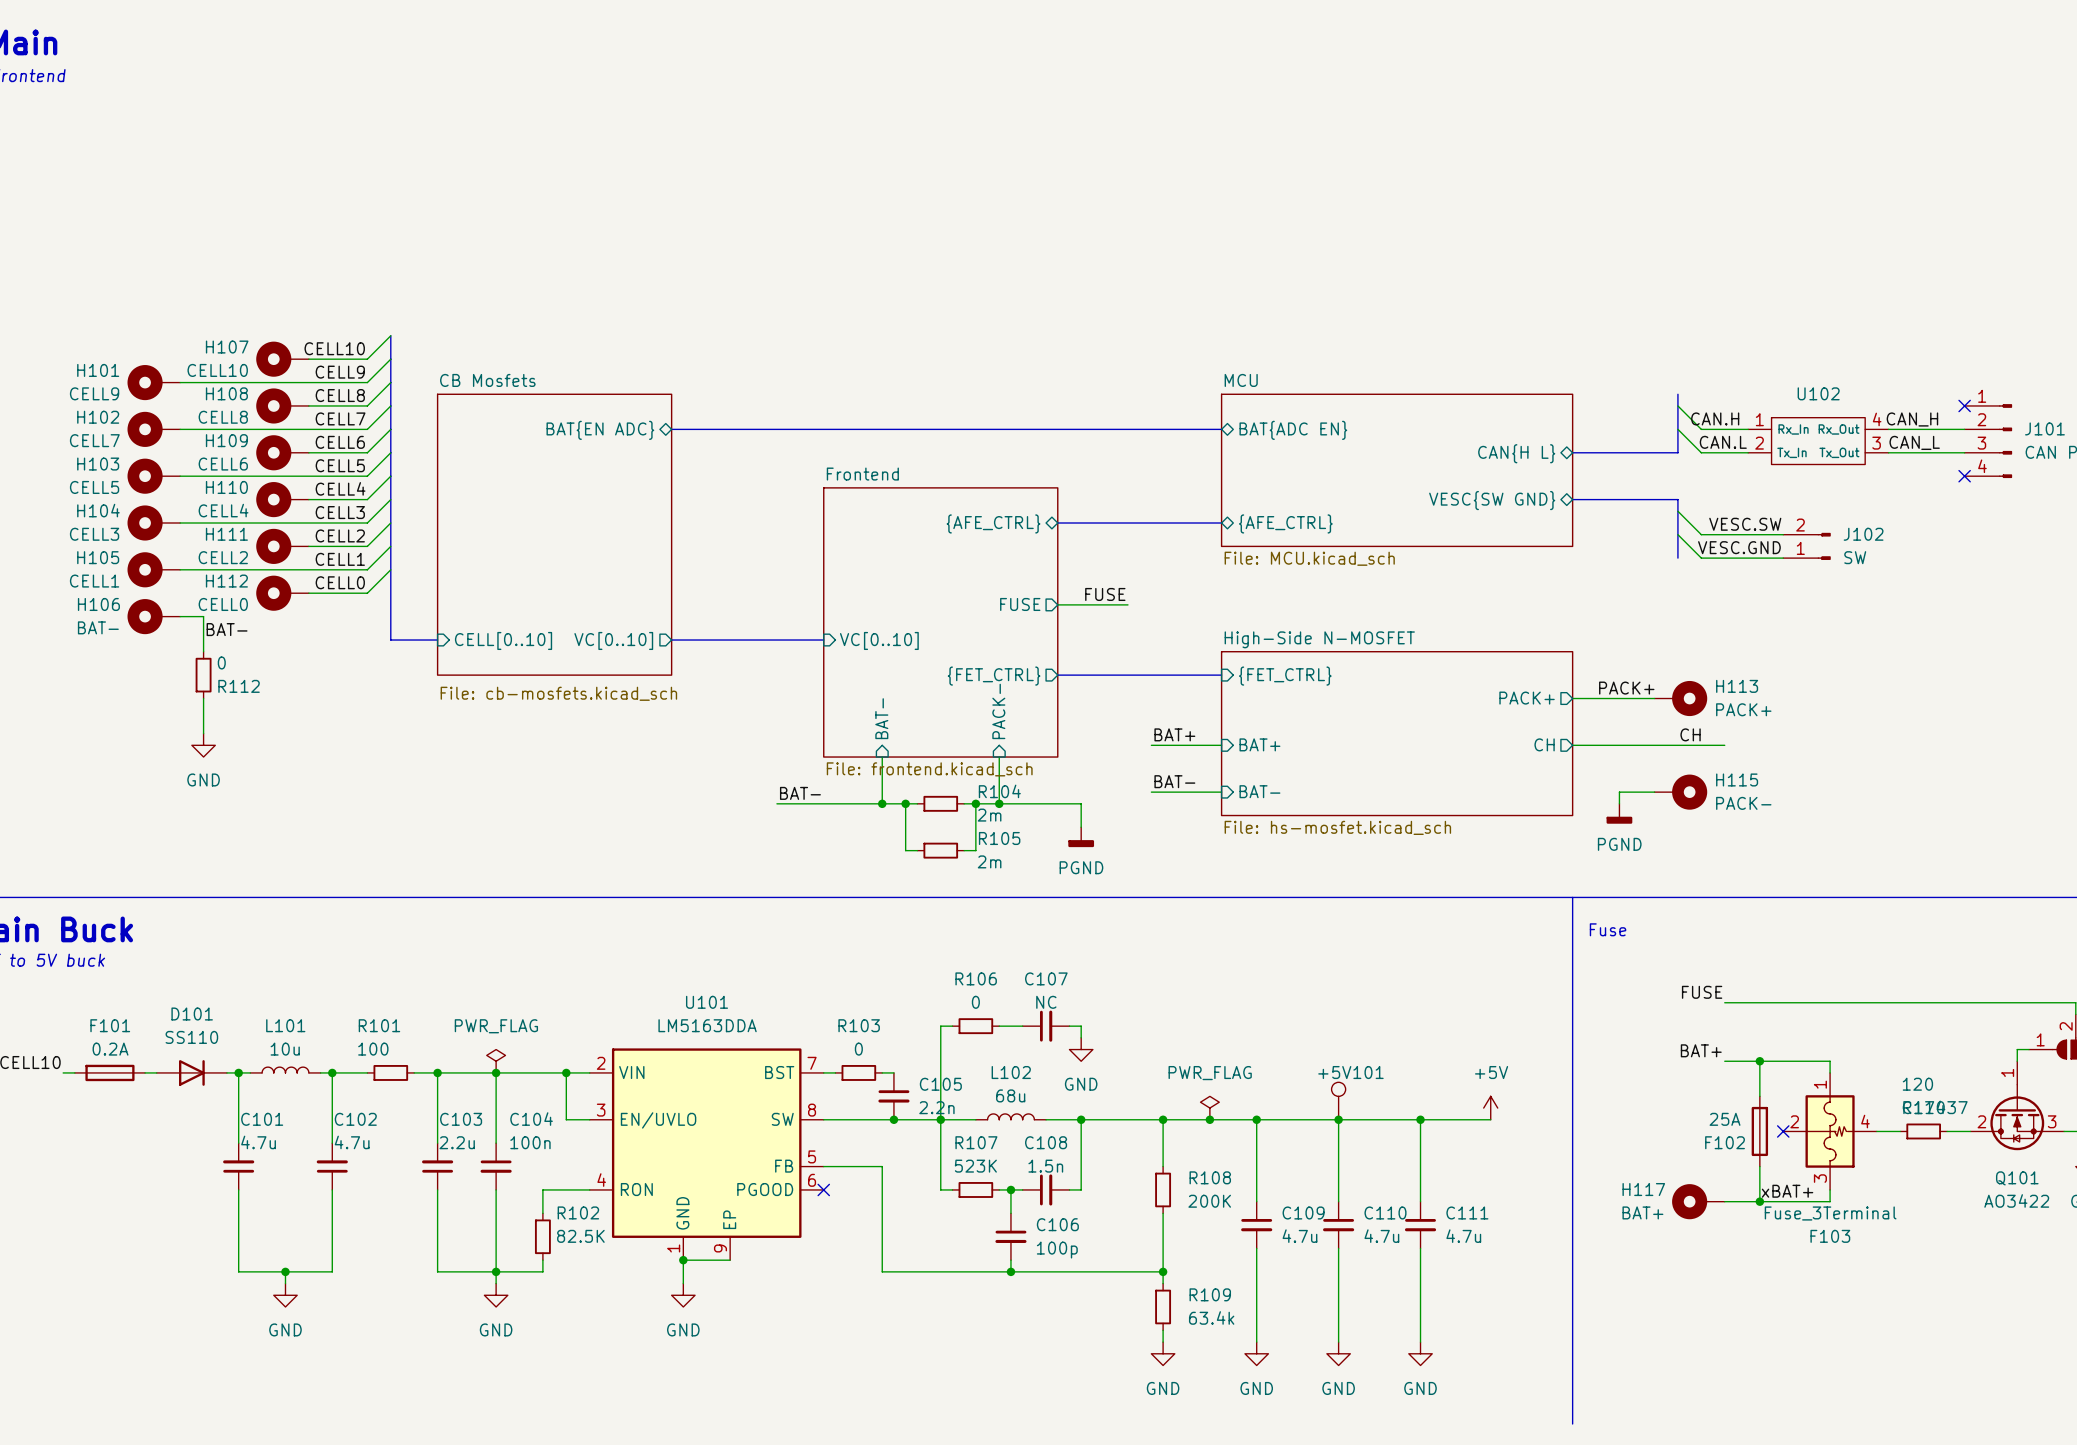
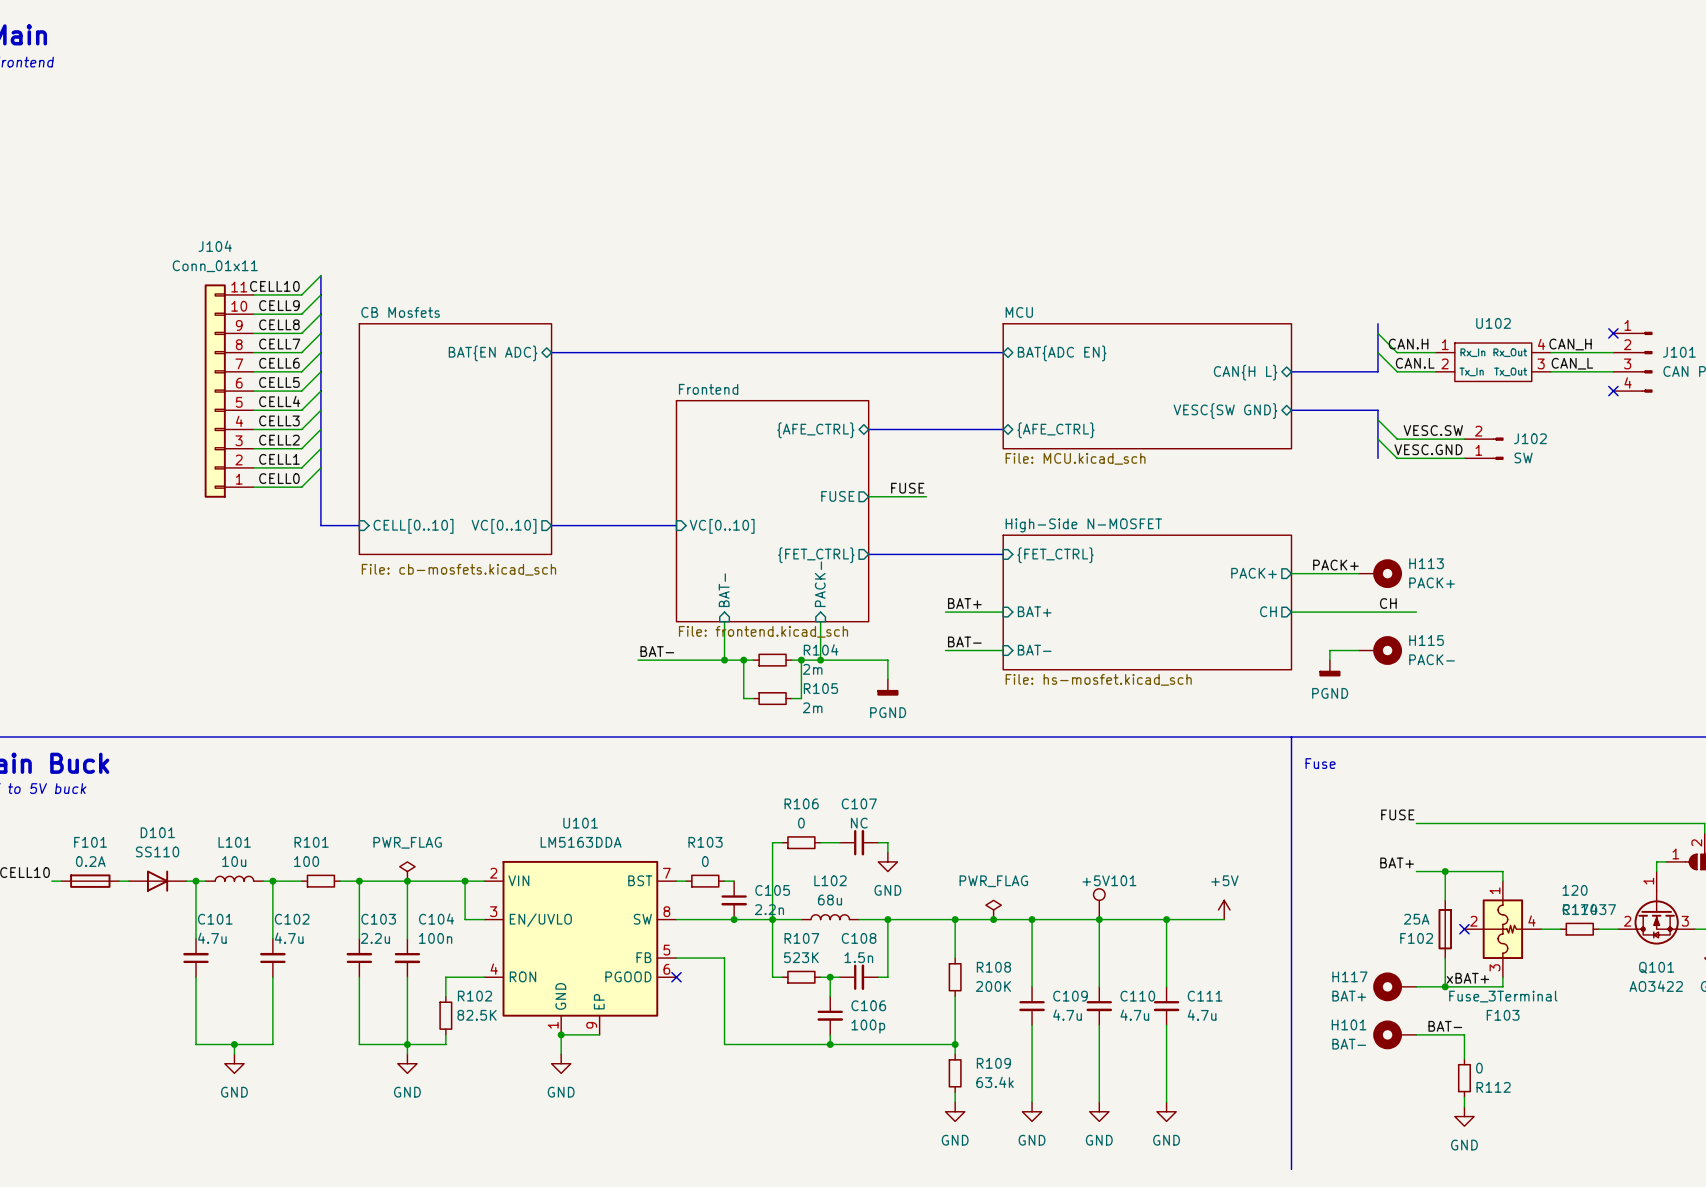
H107: CELL10 (282, 359) -> none
H101 position: (153, 382) -> (1394, 1034)
wire: (180, 382) (308, 382) -> none
H101 value: CELL9 (94, 393) -> BAT- (1349, 1044)
H108: CELL8 (282, 405) -> none
H102: CELL7 (153, 429) -> none
wire: (180, 429) (308, 429) -> none
H109: CELL6 (282, 452) -> none
H103: CELL5 (153, 476) -> none
wire: (180, 476) (308, 476) -> none
J104: none -> Conn_01x11 (229, 391)
H110: CELL4 (282, 499) -> none
H104: CELL3 (153, 522) -> none
wire: (180, 522) (308, 522) -> none
H111: CELL2 (282, 546) -> none
H105: CELL1 (153, 569) -> none
wire: (180, 569) (308, 569) -> none
H112: CELL0 (282, 593) -> none
H106: BAT- (153, 616) -> none
wire: (180, 616) (203, 616) (203, 651) -> none
label: BAT- (227, 629) -> none
R112 position: (203, 675) -> (1464, 1078)
wire: (203, 698) (203, 733) -> none
power symbol: GND (203, 745) -> none
label: none -> BAT- (1445, 1026)
wire: none -> (1416, 1034) (1464, 1034) (1464, 1058)
wire: none -> (1464, 1097) (1464, 1106)
power symbol: none -> GND (1464, 1116)

